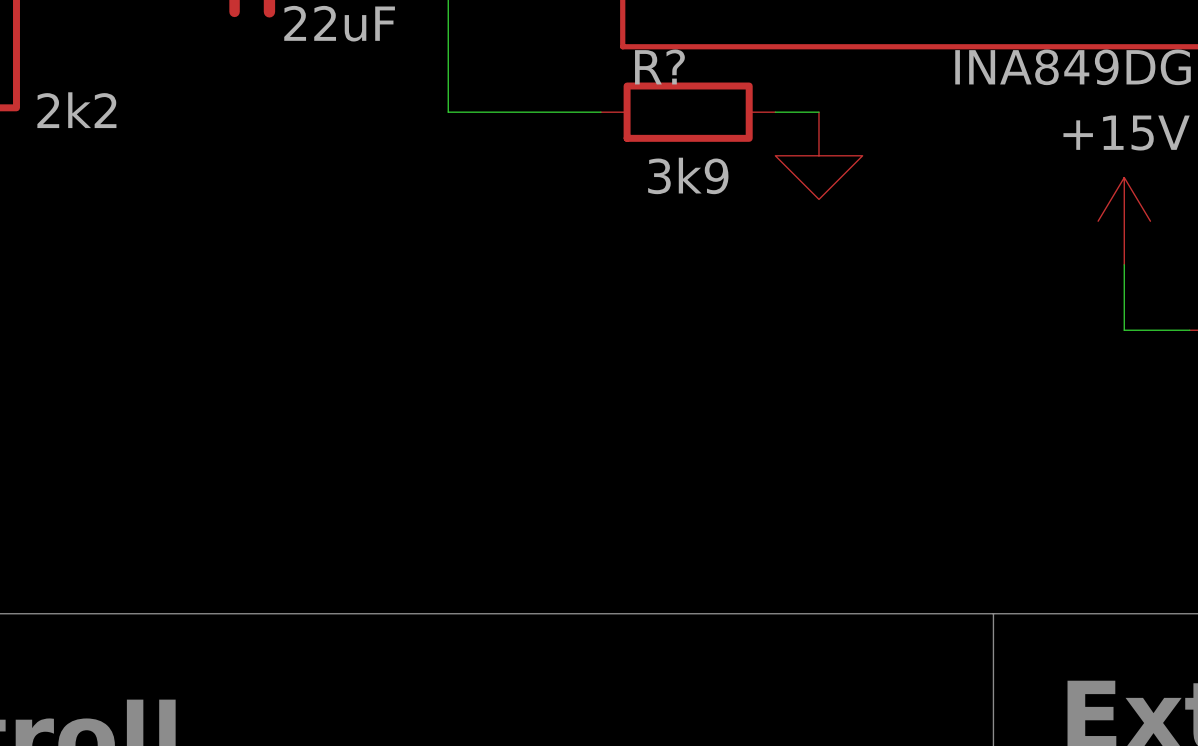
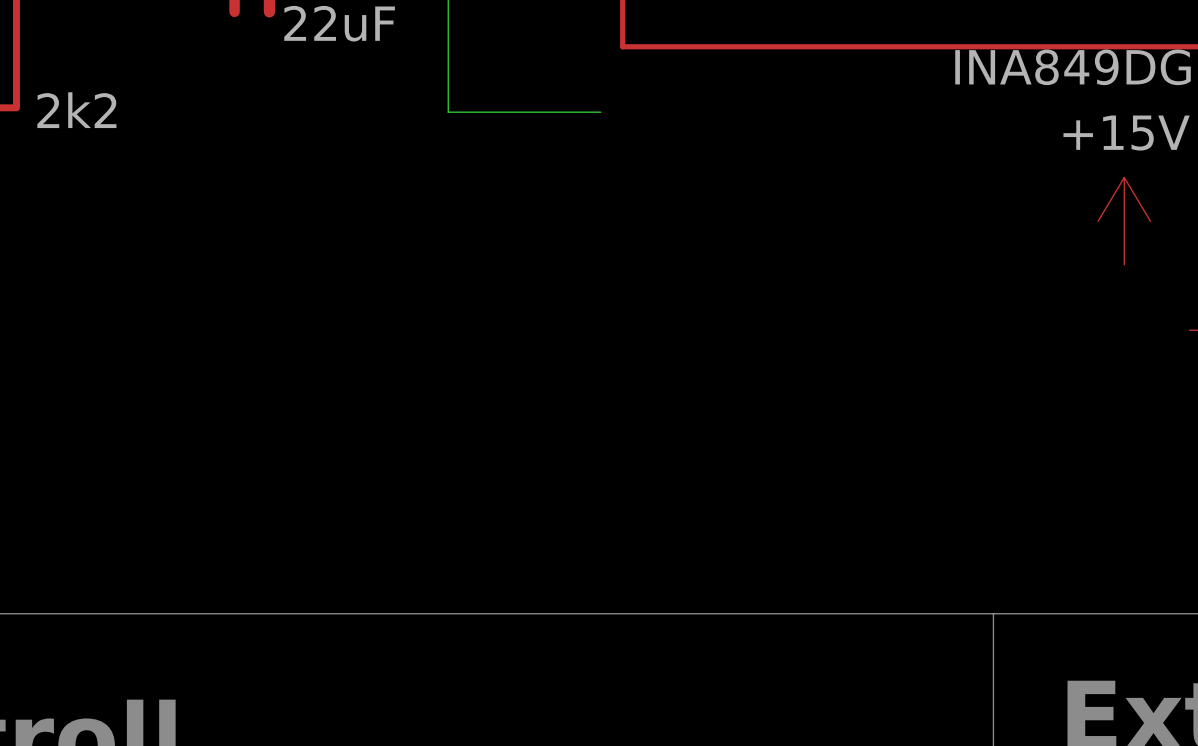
R?: 3k9 (688, 112) -> none
wire: (775, 112) (818, 112) -> none
power symbol: (818, 155) -> none
wire: (1124, 264) (1124, 330) (1189, 330) -> none

